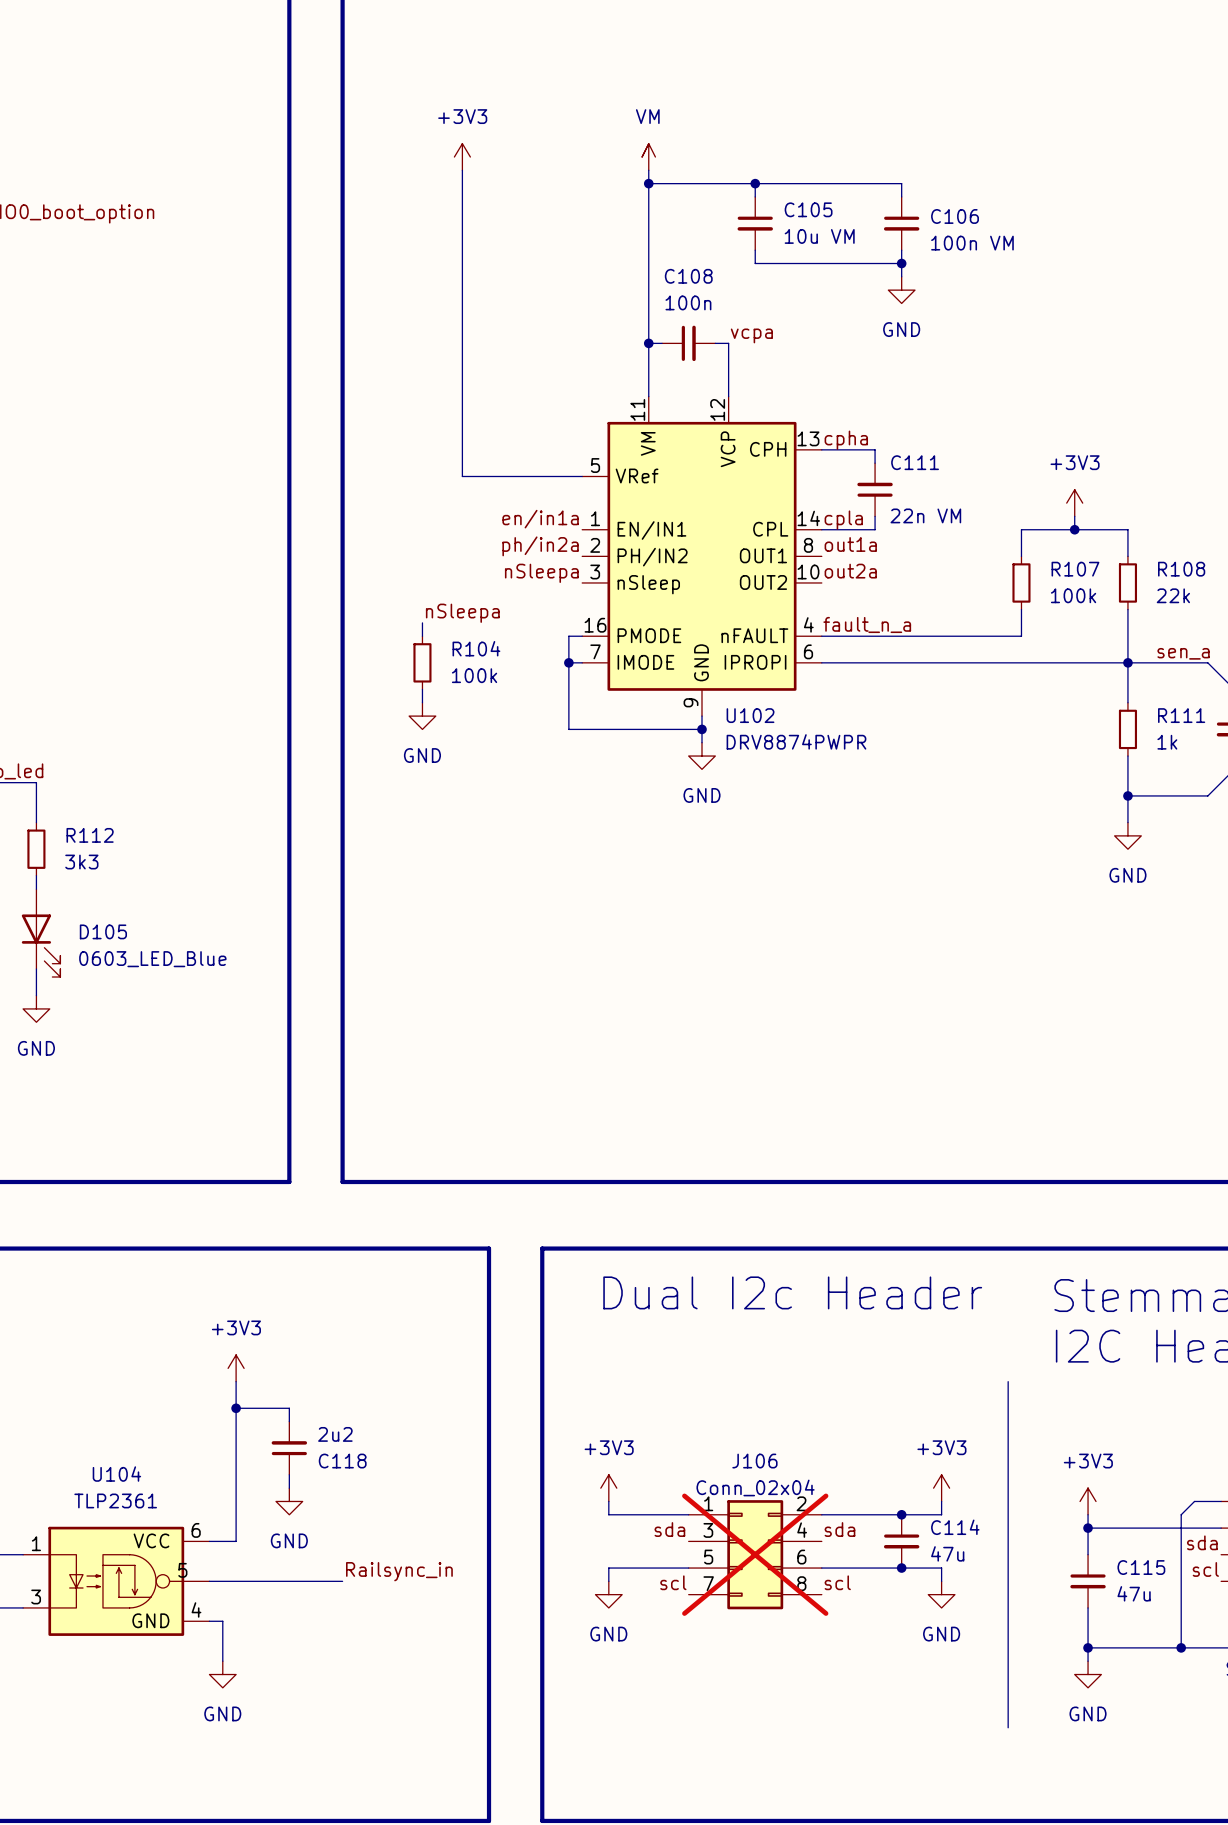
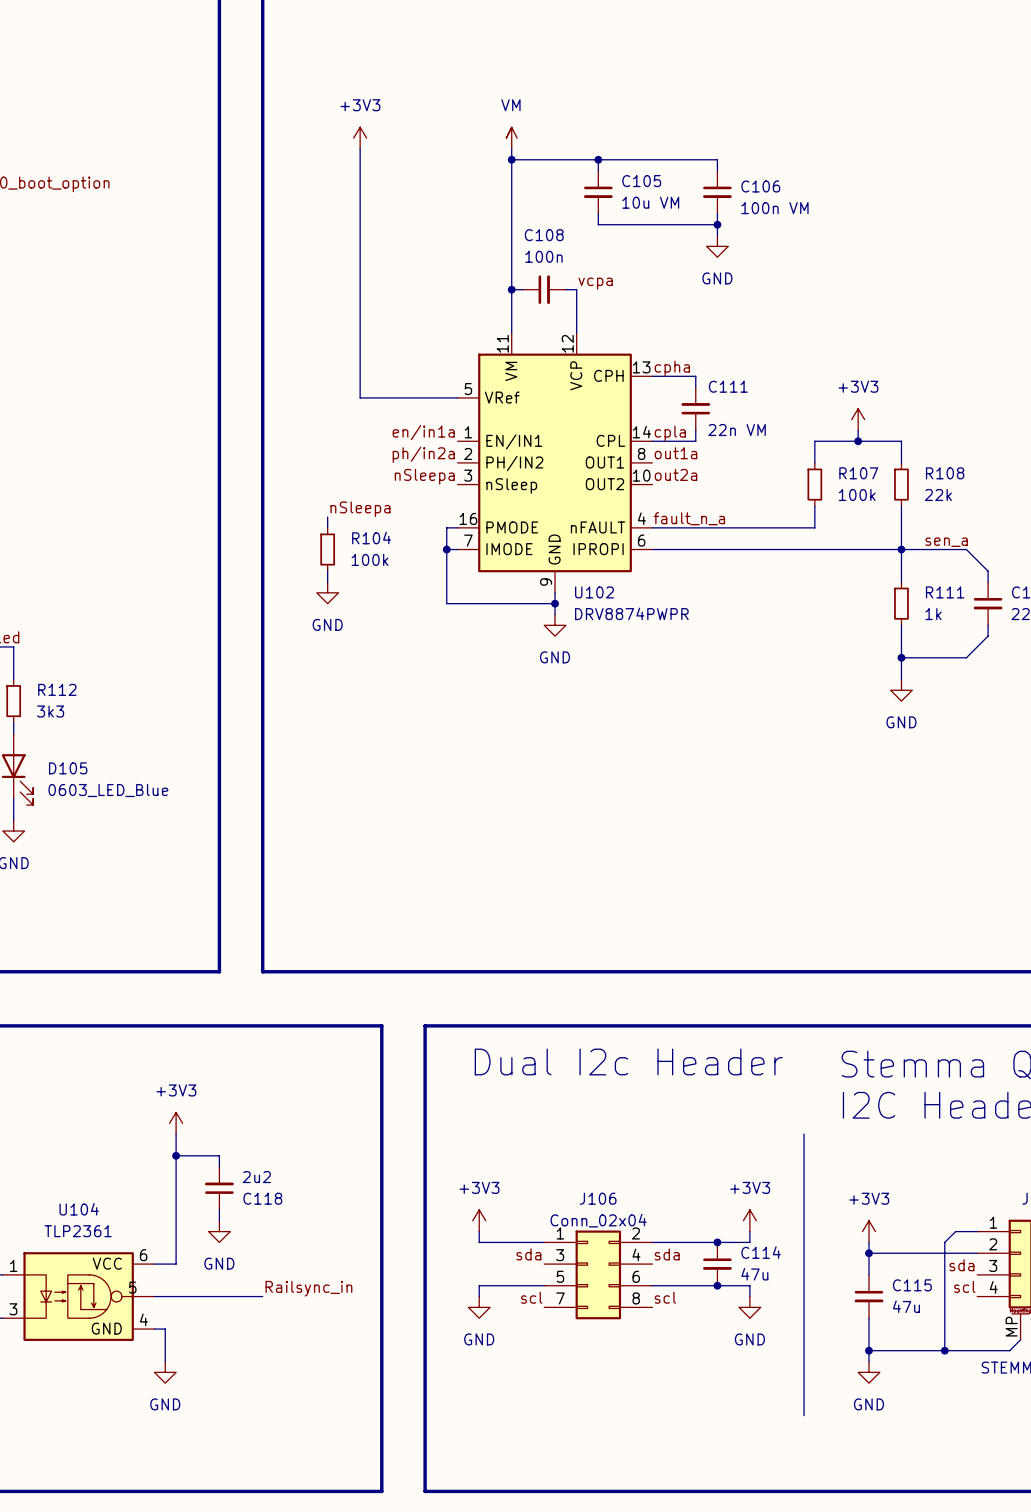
J106 do-not-place cross: (755, 1554) -> none

